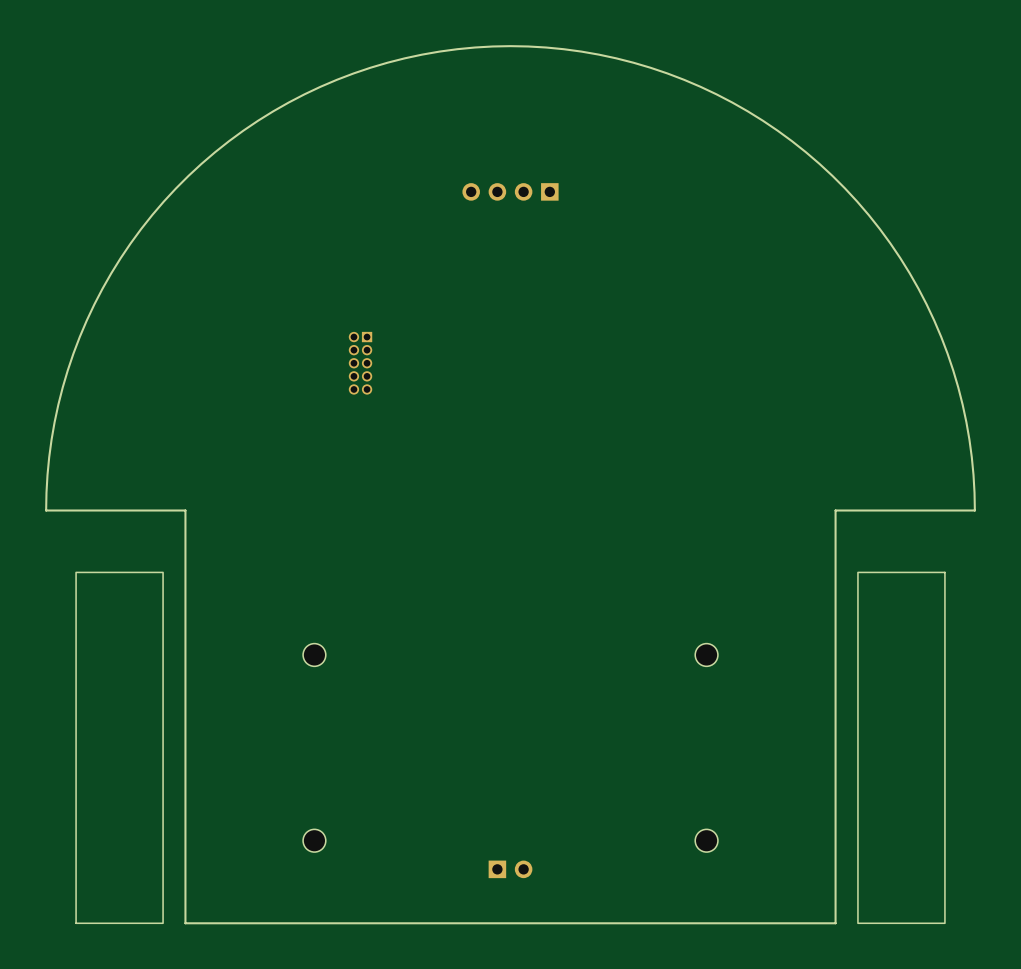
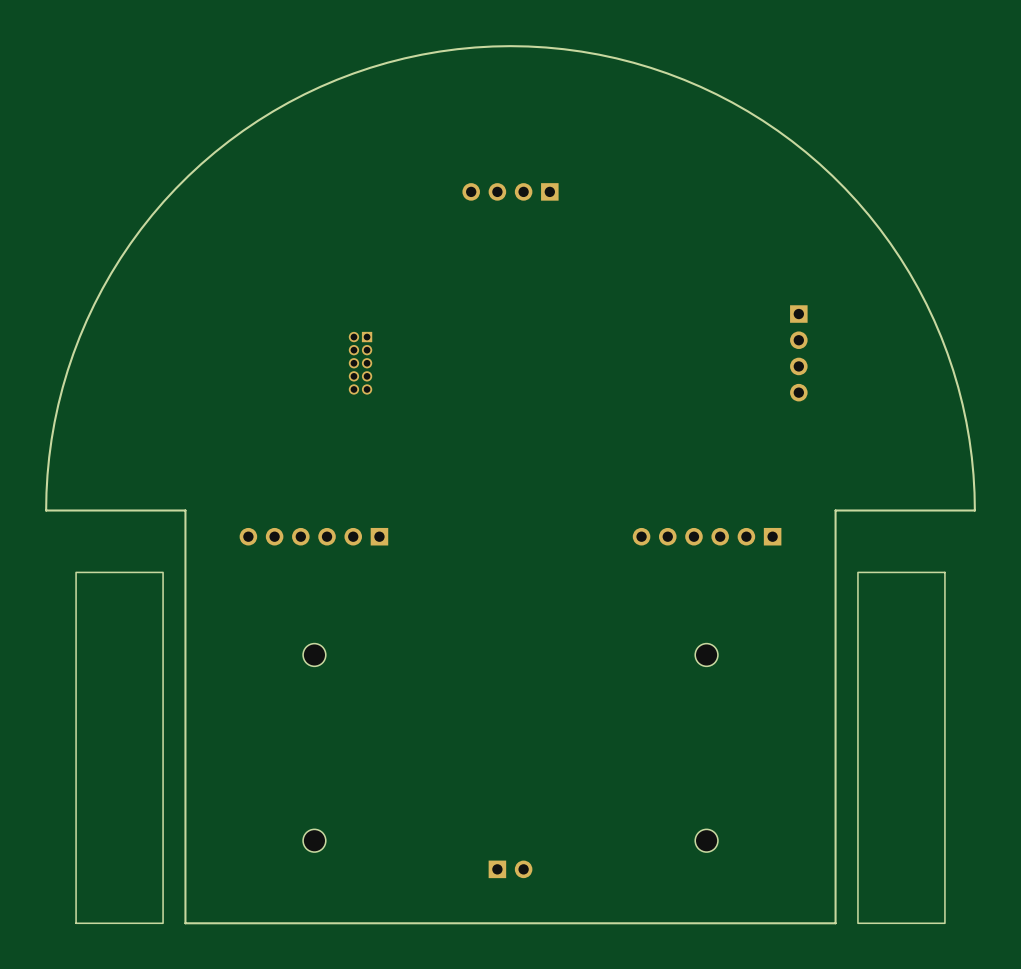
part: none -> (798, 353)
part: none -> (313, 536)
part: none -> (707, 536)

